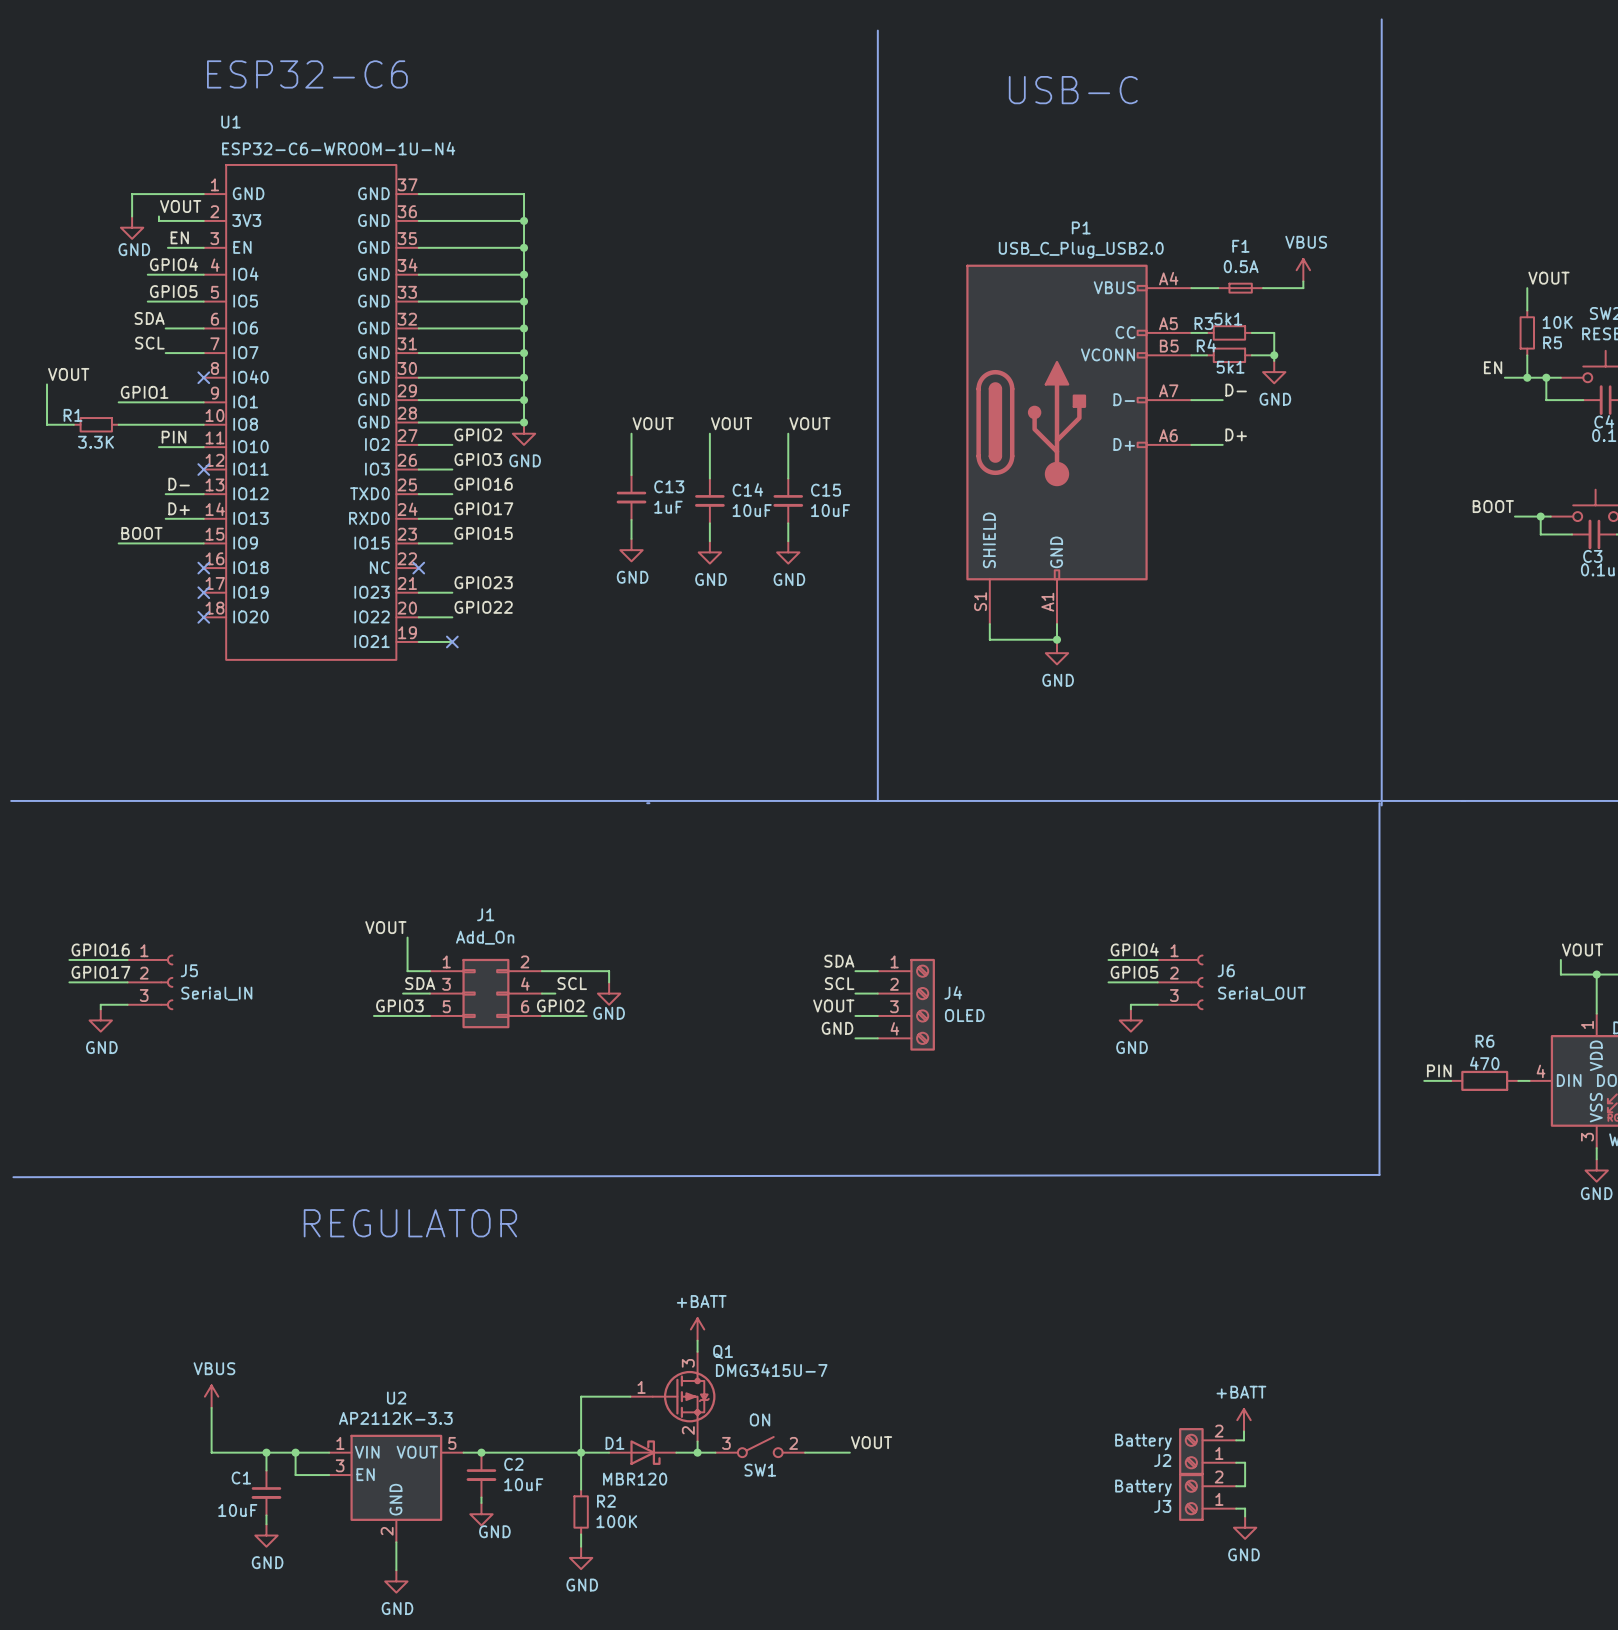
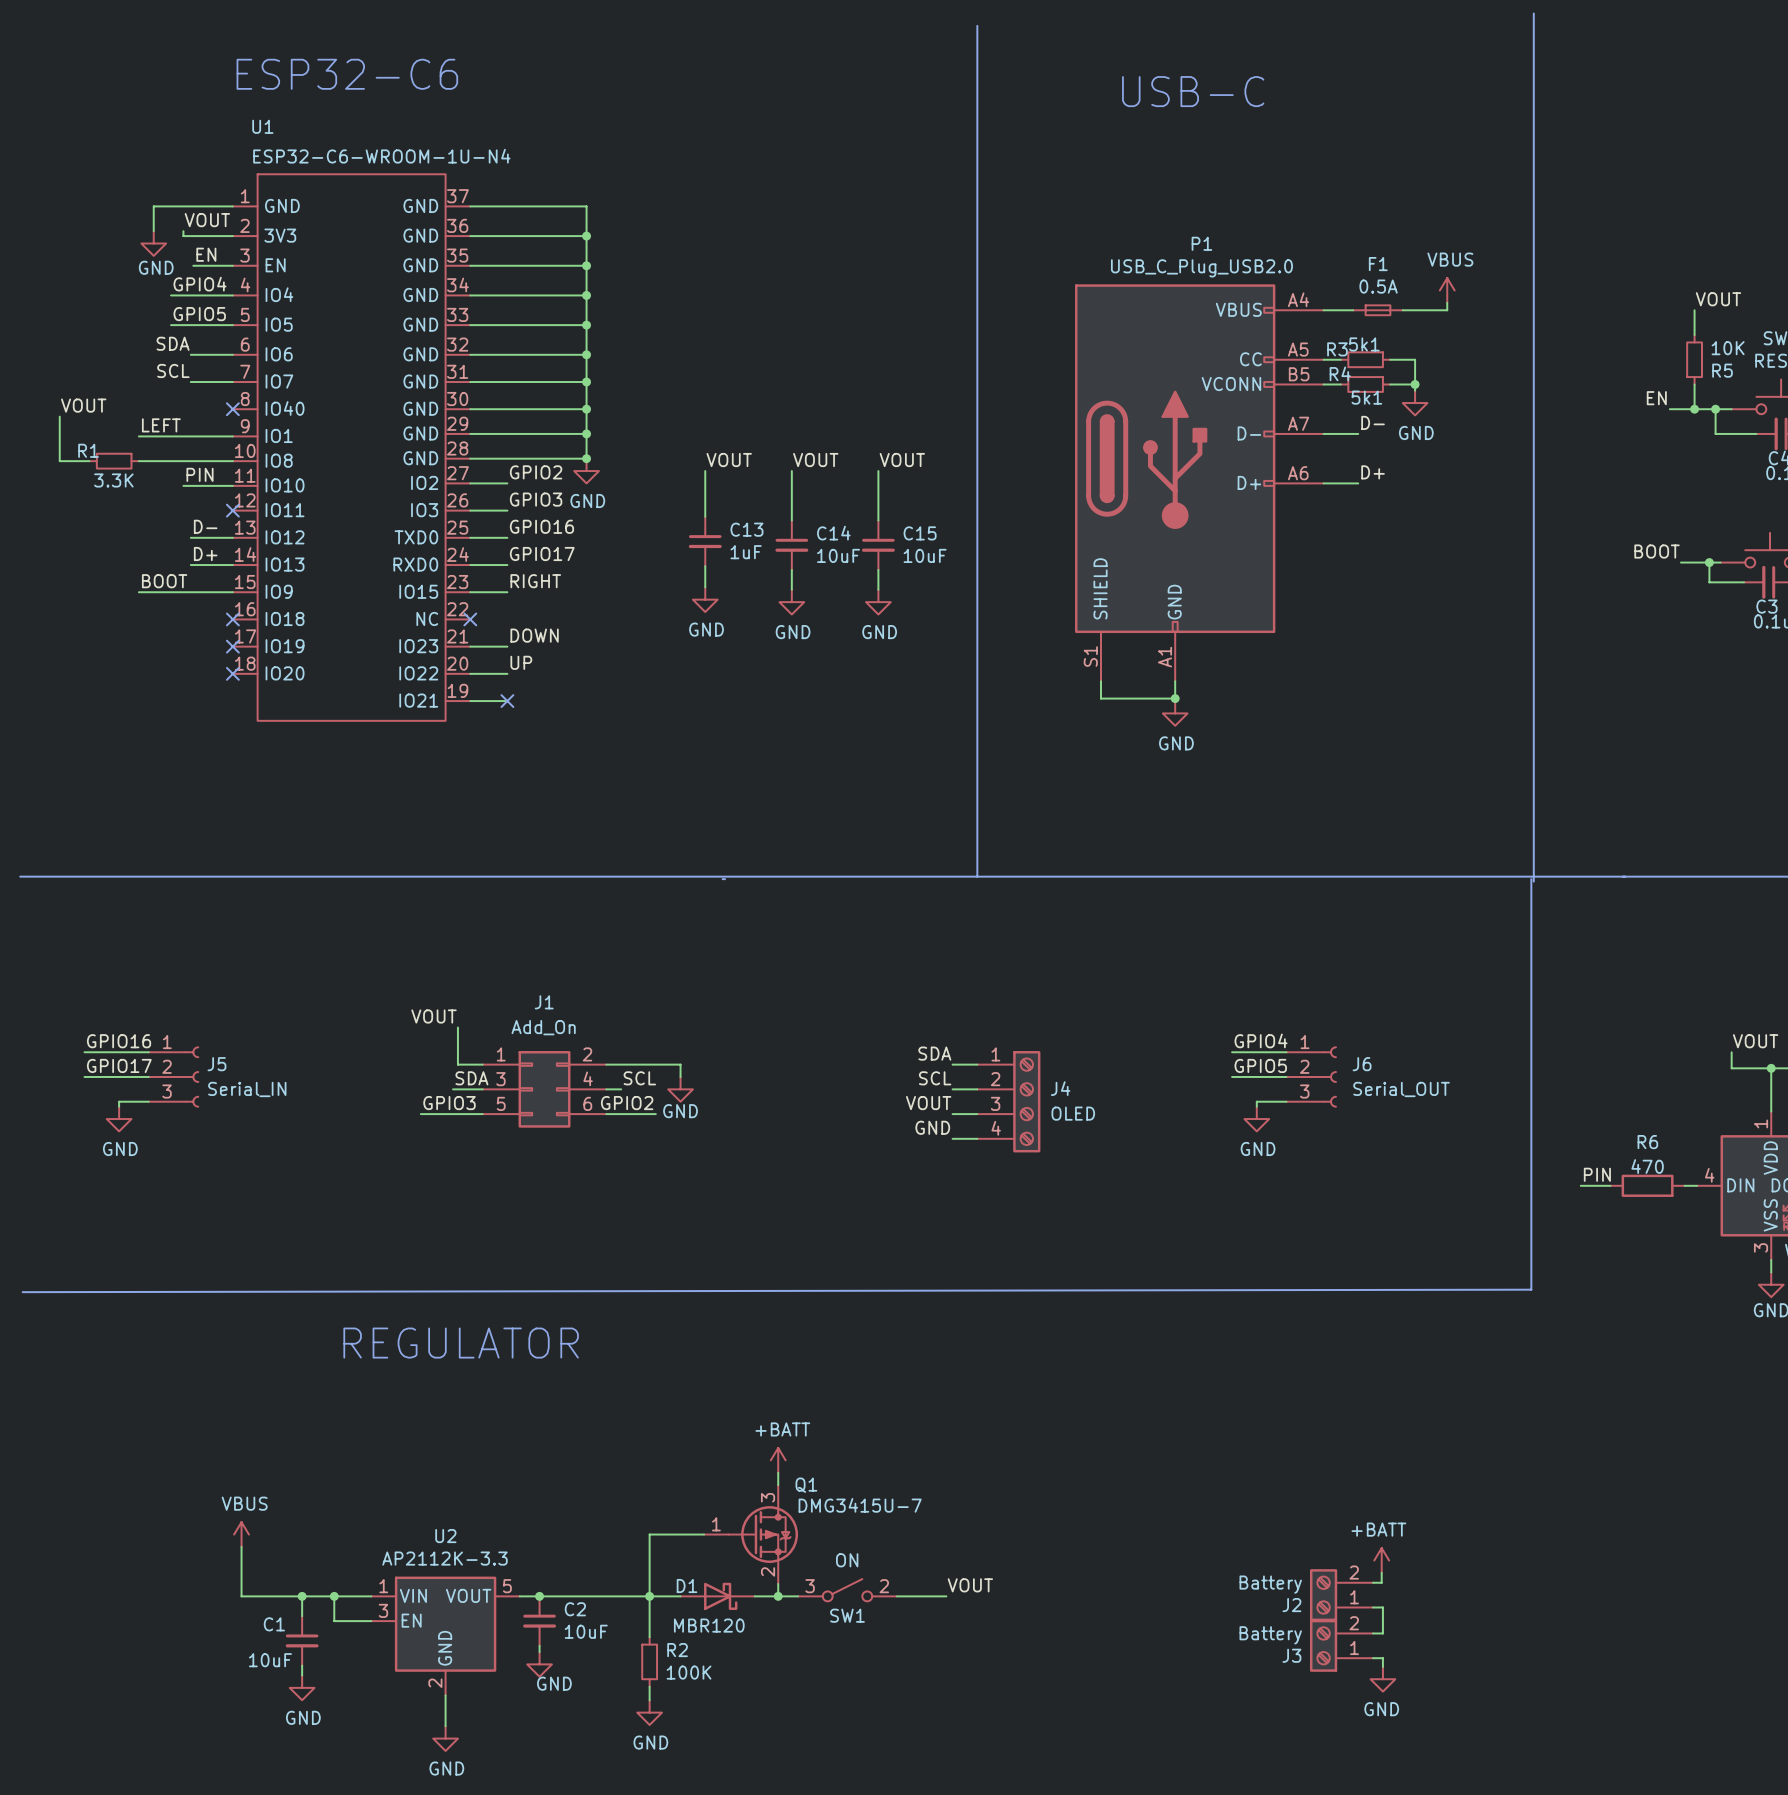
label: GPIO1 (144, 392) -> LEFT (161, 425)
label: GPIO15 (483, 533) -> RIGHT (535, 581)
label: GPIO23 (483, 582) -> DOWN (534, 635)
label: GPIO22 (483, 607) -> UP (521, 662)

